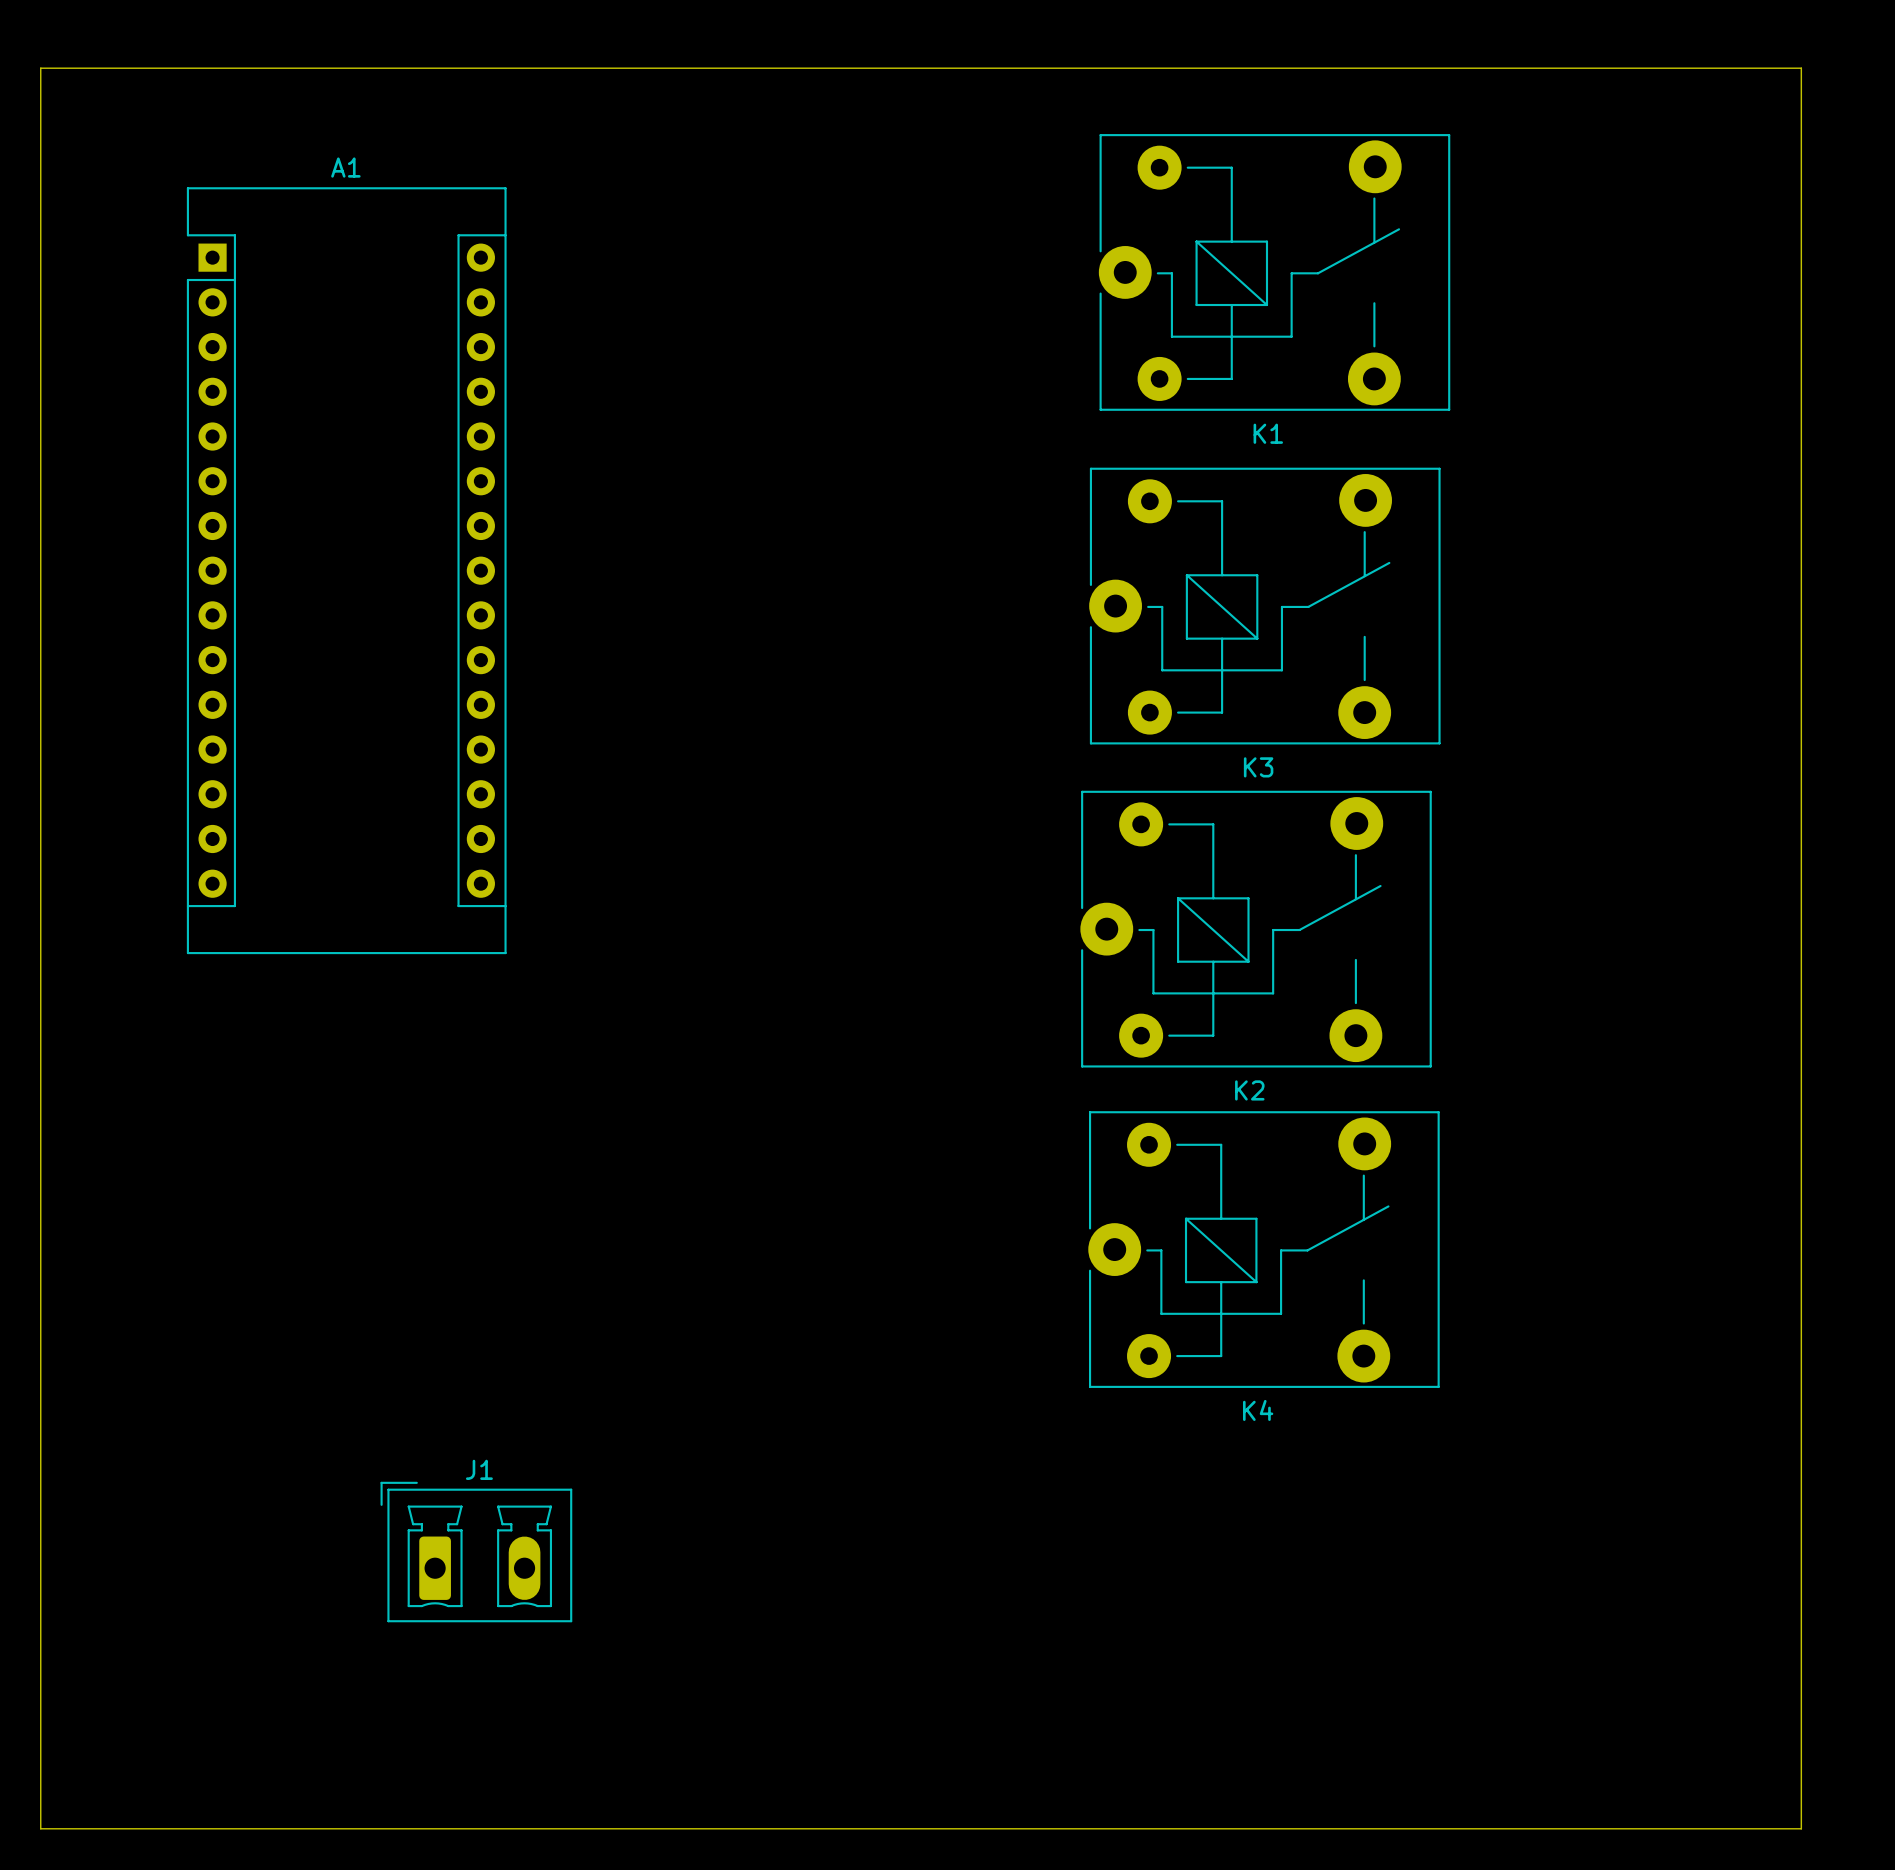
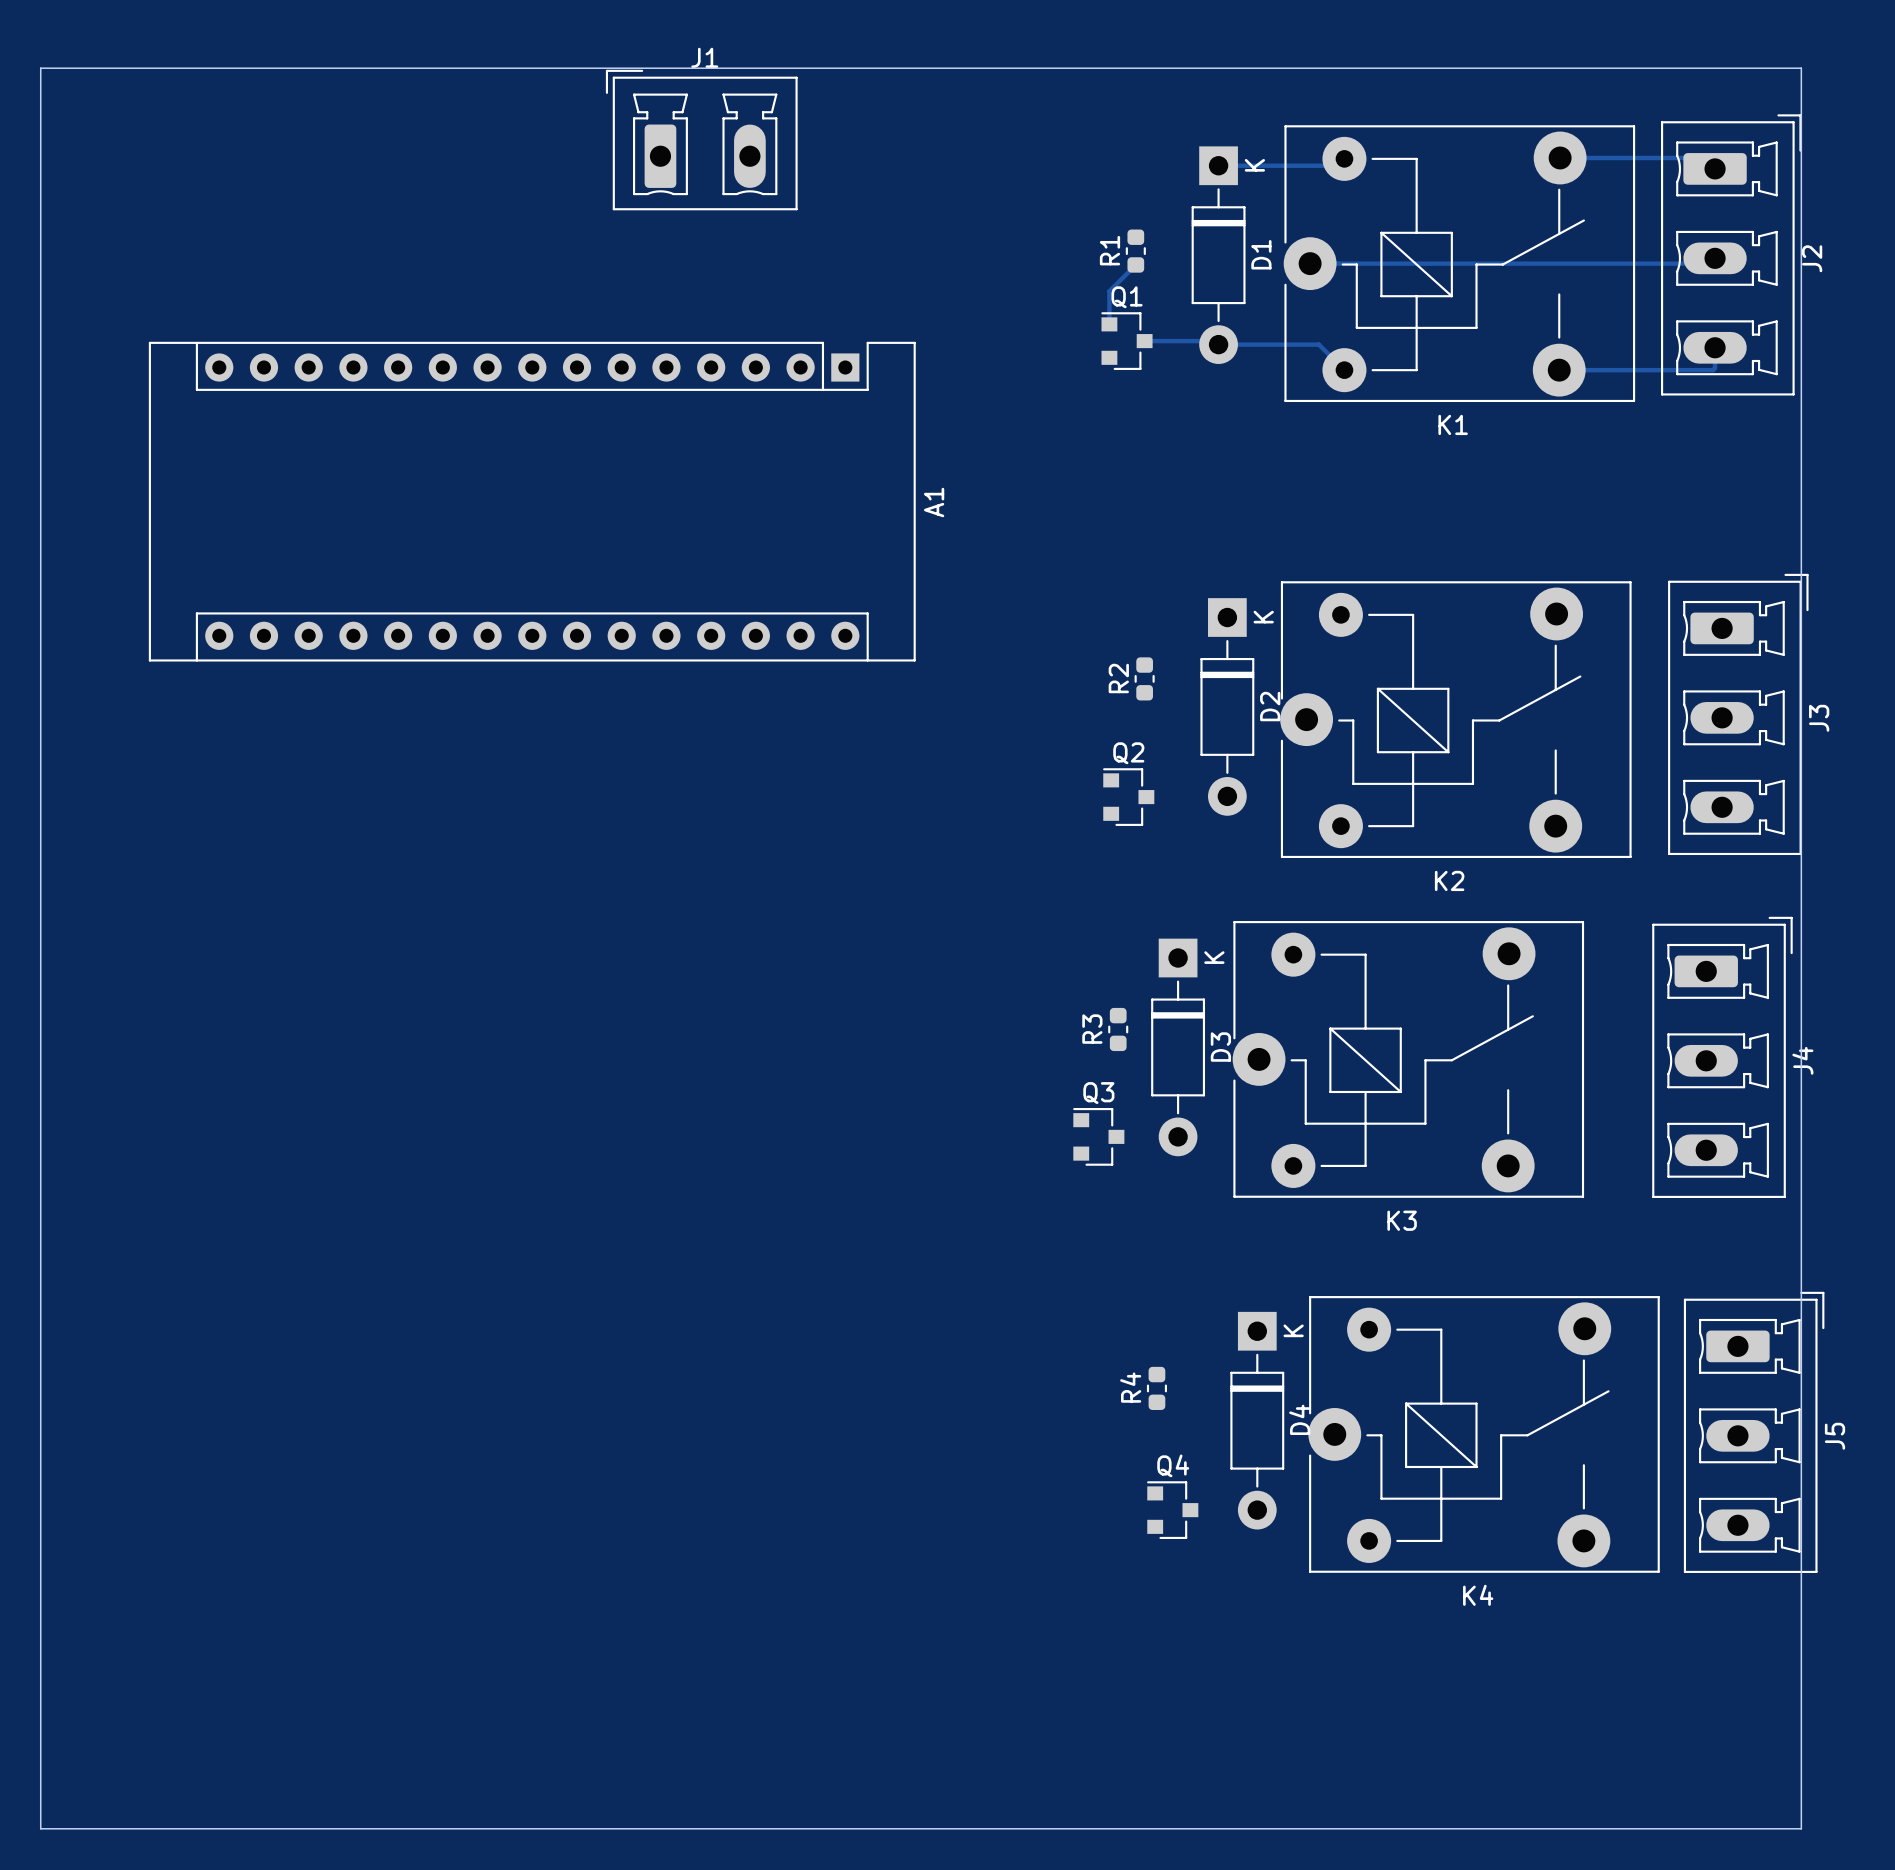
track: none -> (1560, 157) (1704, 157) (1715, 168)
track: none -> (1344, 158) (1337, 165) (1218, 165)
R1: none -> (1135, 251)
J2: none -> (1731, 254)
D1: none -> (1218, 255)
track: none -> (1715, 258) (1709, 263) (1310, 263)
track: none -> (1135, 264) (1109, 291) (1109, 324)
K1 position: (1274, 272) -> (1459, 263)
Q1: none -> (1126, 341)
track: none -> (1144, 341) (1215, 341) (1218, 344) (1318, 344) (1344, 370)
track: none -> (1715, 347) (1715, 368) (1712, 370) (1559, 370)
A1 rotation: 0° (346, 570) -> 90° clockwise (532, 501)
K3 position: (1264, 606) -> (1408, 1059)
R2: none -> (1144, 678)
D2: none -> (1227, 706)
J3: none -> (1738, 714)
Q2: none -> (1128, 797)
K2 position: (1256, 929) -> (1455, 719)
R3: none -> (1118, 1029)
D3: none -> (1178, 1047)
J4: none -> (1722, 1057)
Q3: none -> (1098, 1136)
K4 position: (1263, 1249) -> (1484, 1434)
R4: none -> (1156, 1388)
D4: none -> (1257, 1420)
J5: none -> (1754, 1432)
Q4: none -> (1172, 1510)
J1 position: (476, 1552) -> (701, 140)

